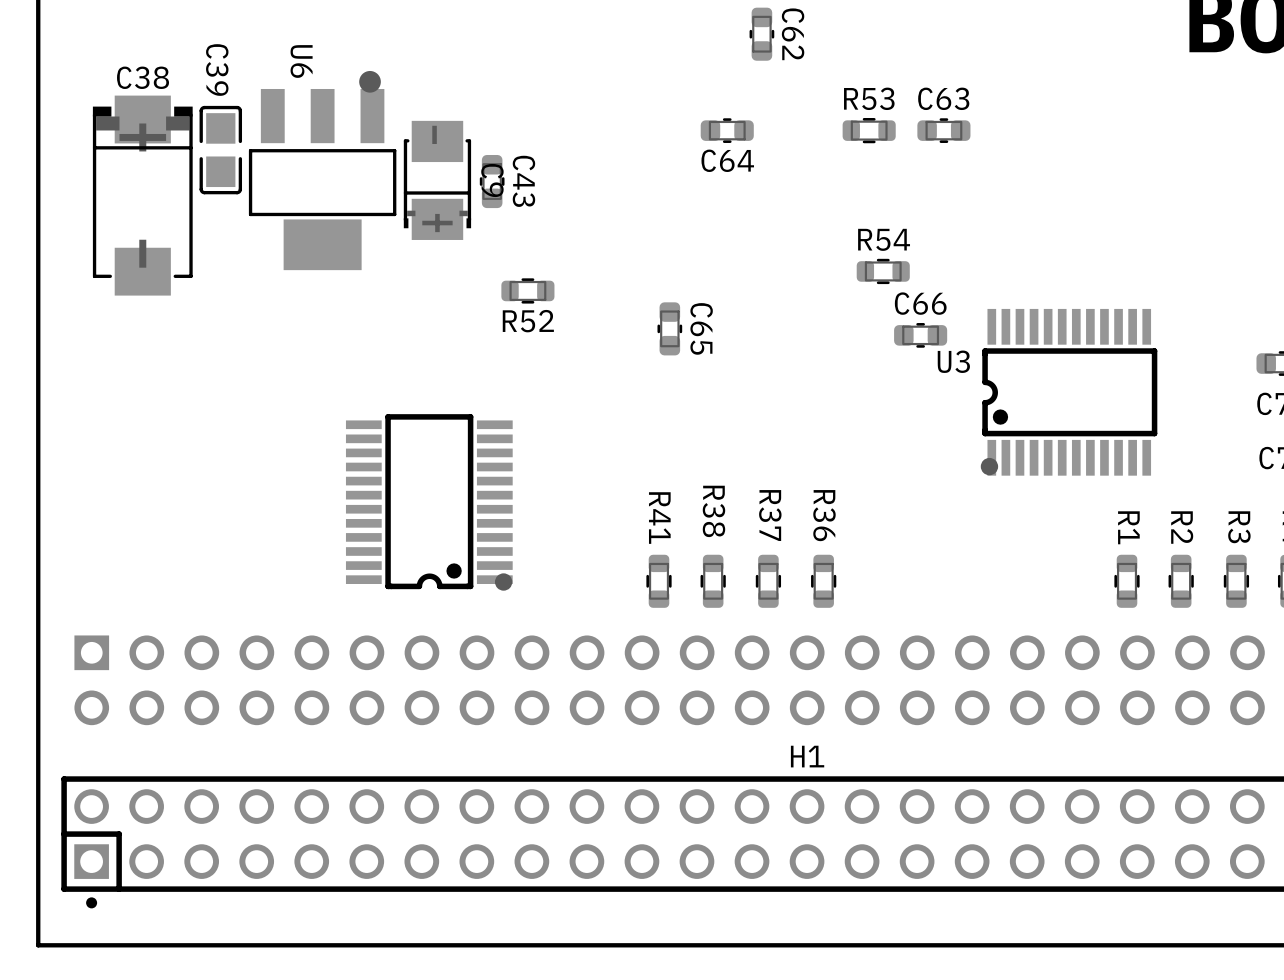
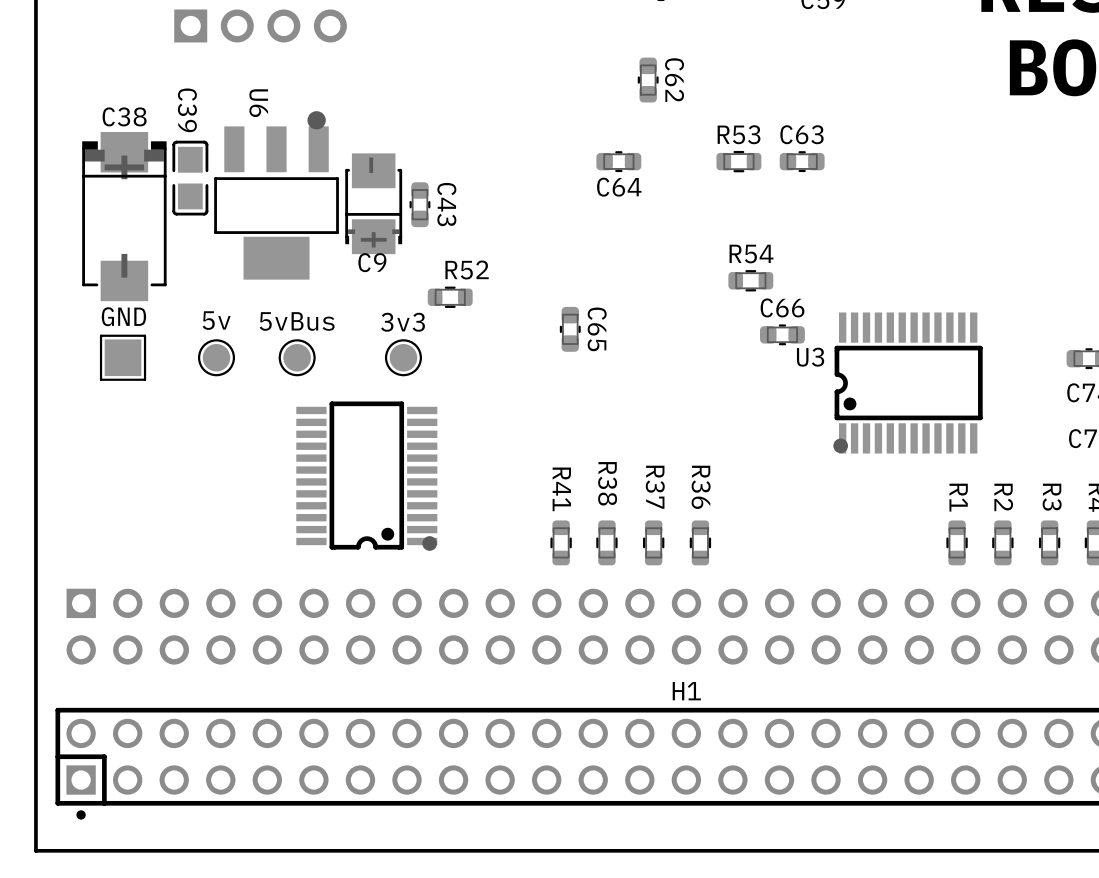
C9 name rotation: 0° (492, 180) -> 90° counterclockwise (372, 262)
C9 name position: C9 (492, 180) -> C9 (372, 262)
R52 name position: R52 (528, 321) -> R52 (467, 270)
part: none -> GND (123, 357)
part: none -> 5v (216, 357)
part: none -> 5vBus (297, 357)
part: none -> 3v3 (403, 357)

